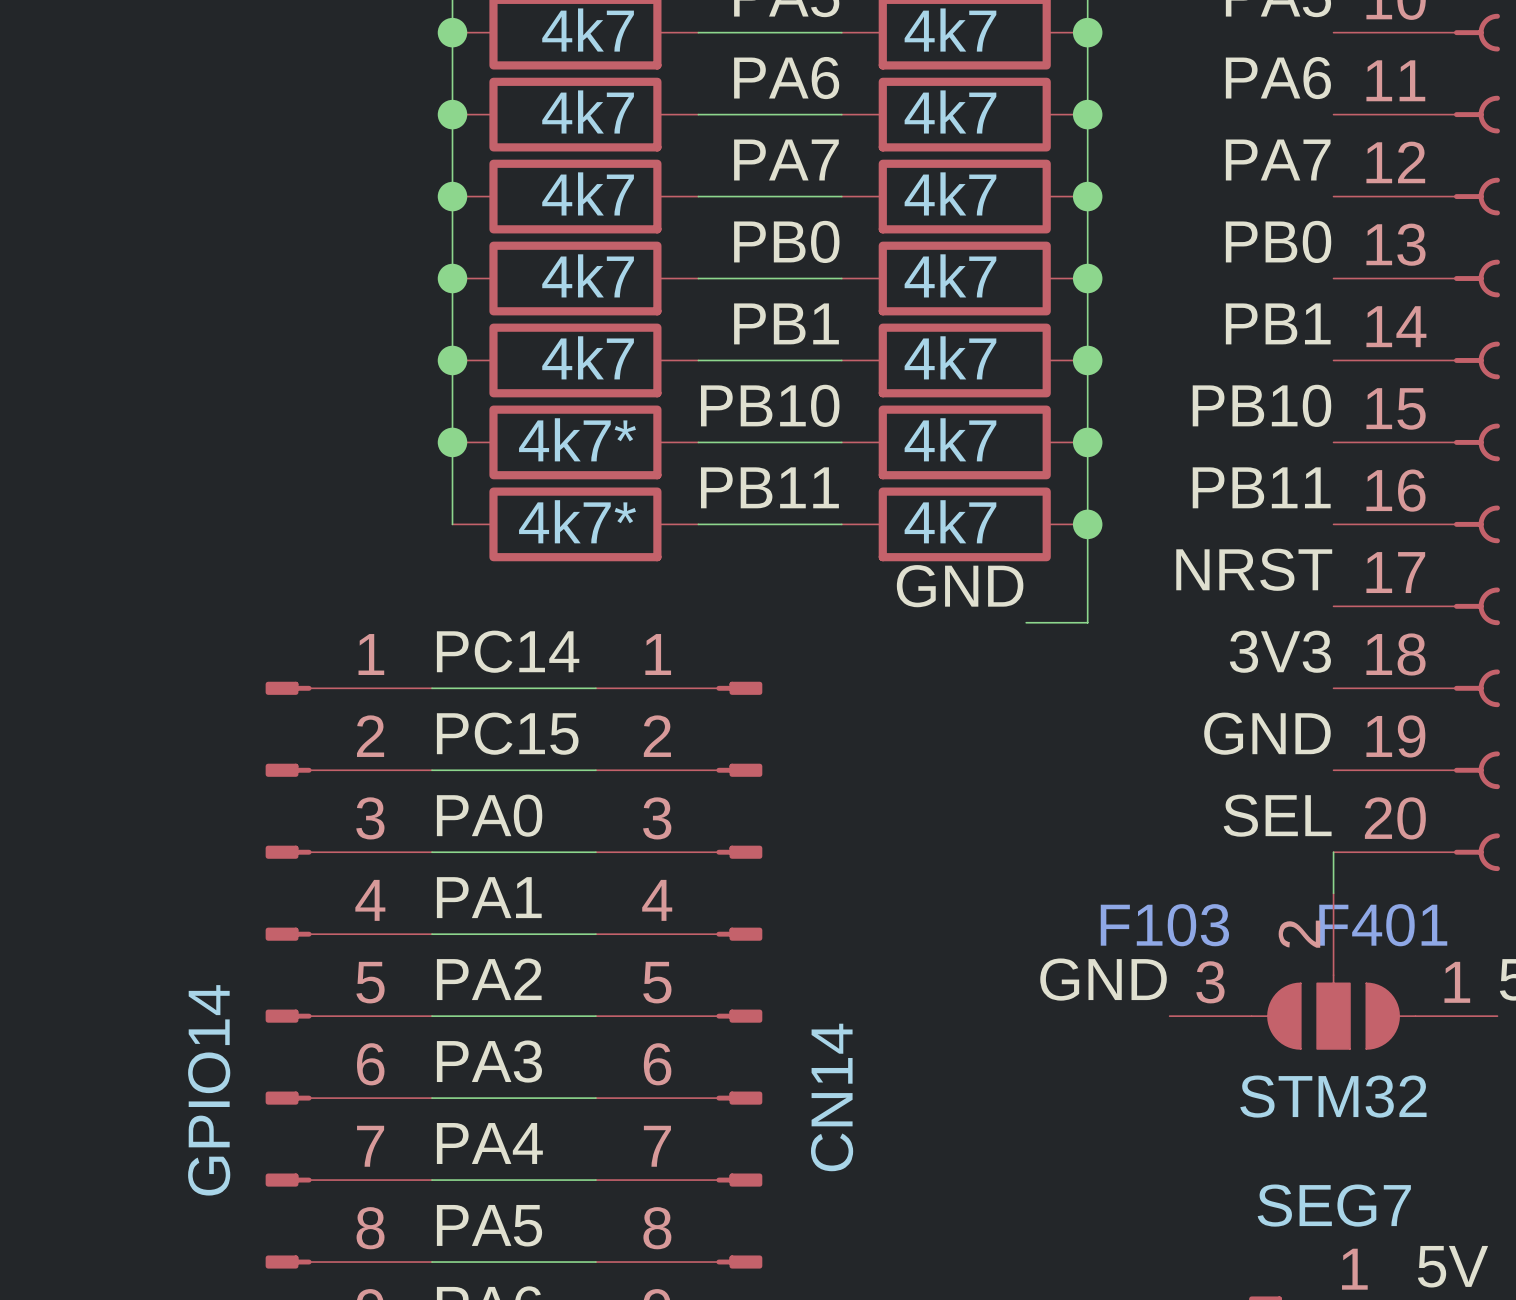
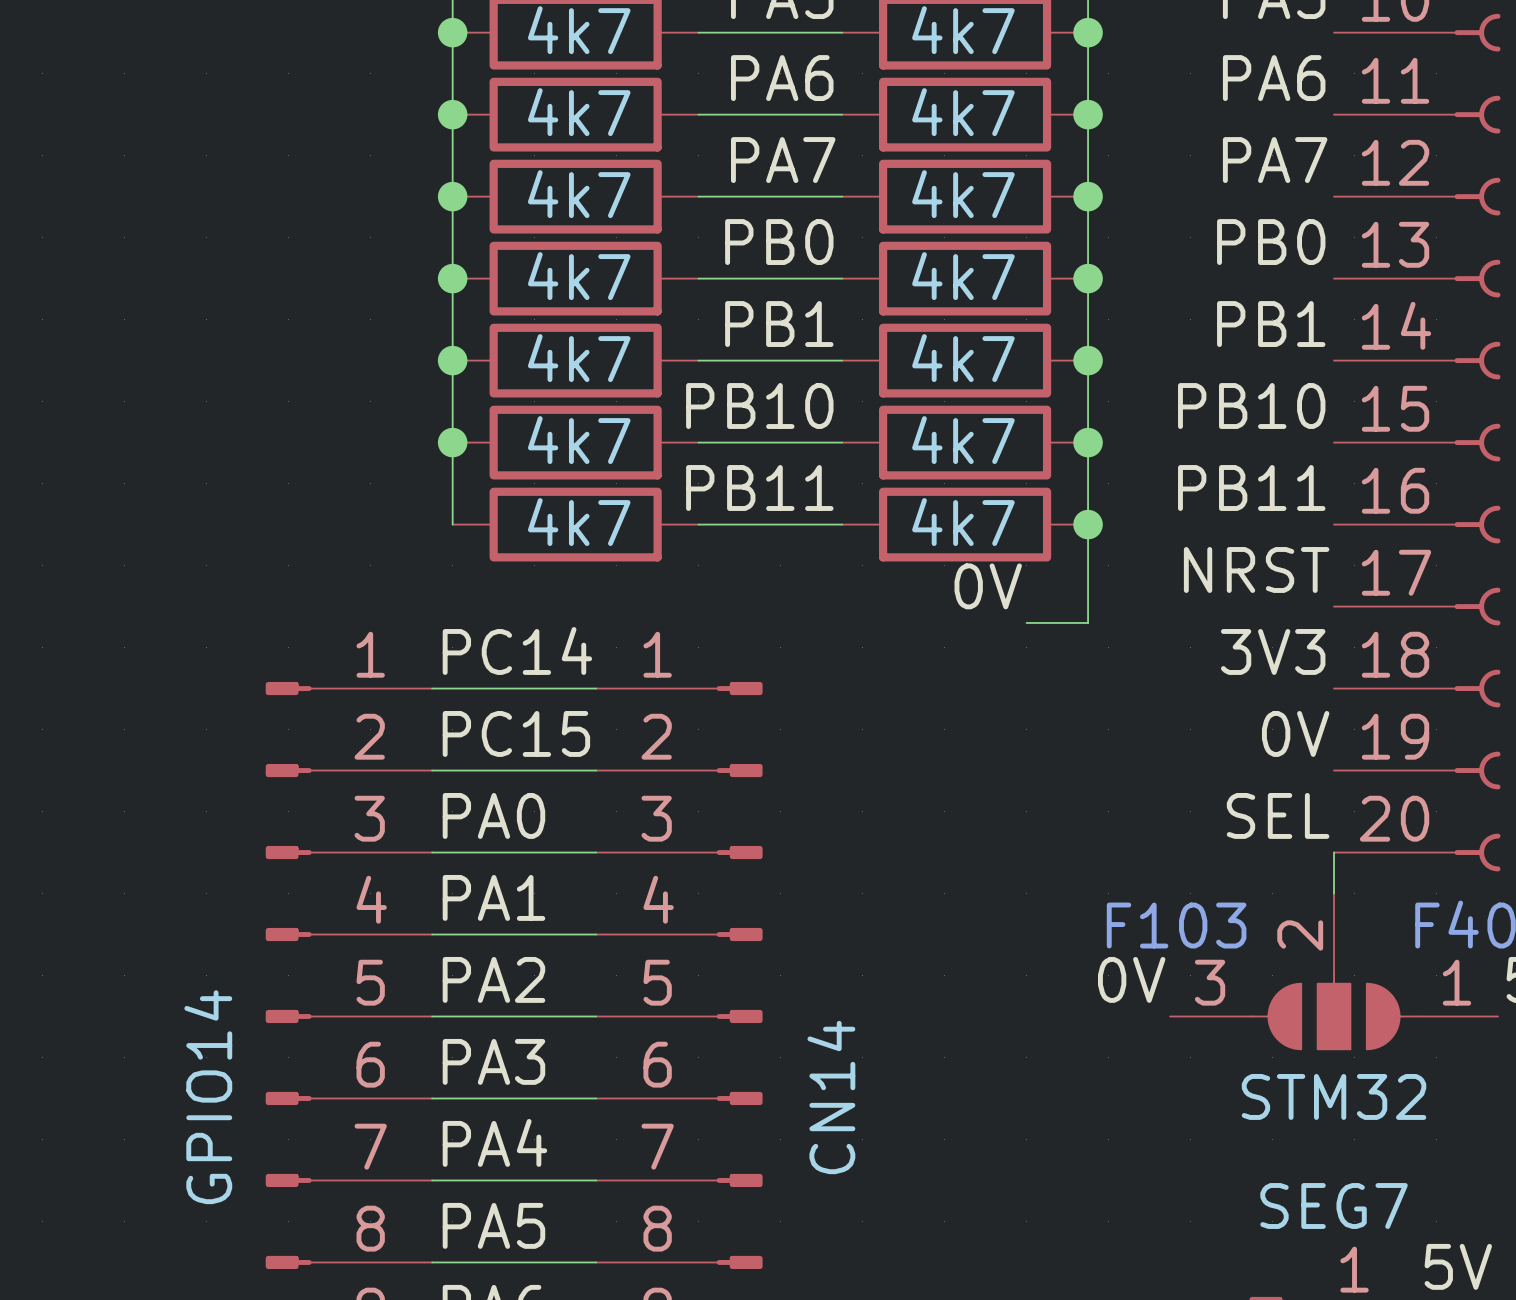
part value: 4k7* (577, 439) -> 4k7 (579, 440)
part value: 4k7* (577, 521) -> 4k7 (579, 522)
label: GND (960, 586) -> 0V (988, 586)
label: GND (1267, 733) -> 0V (1295, 733)
label: GND (1103, 979) -> 0V (1131, 979)

